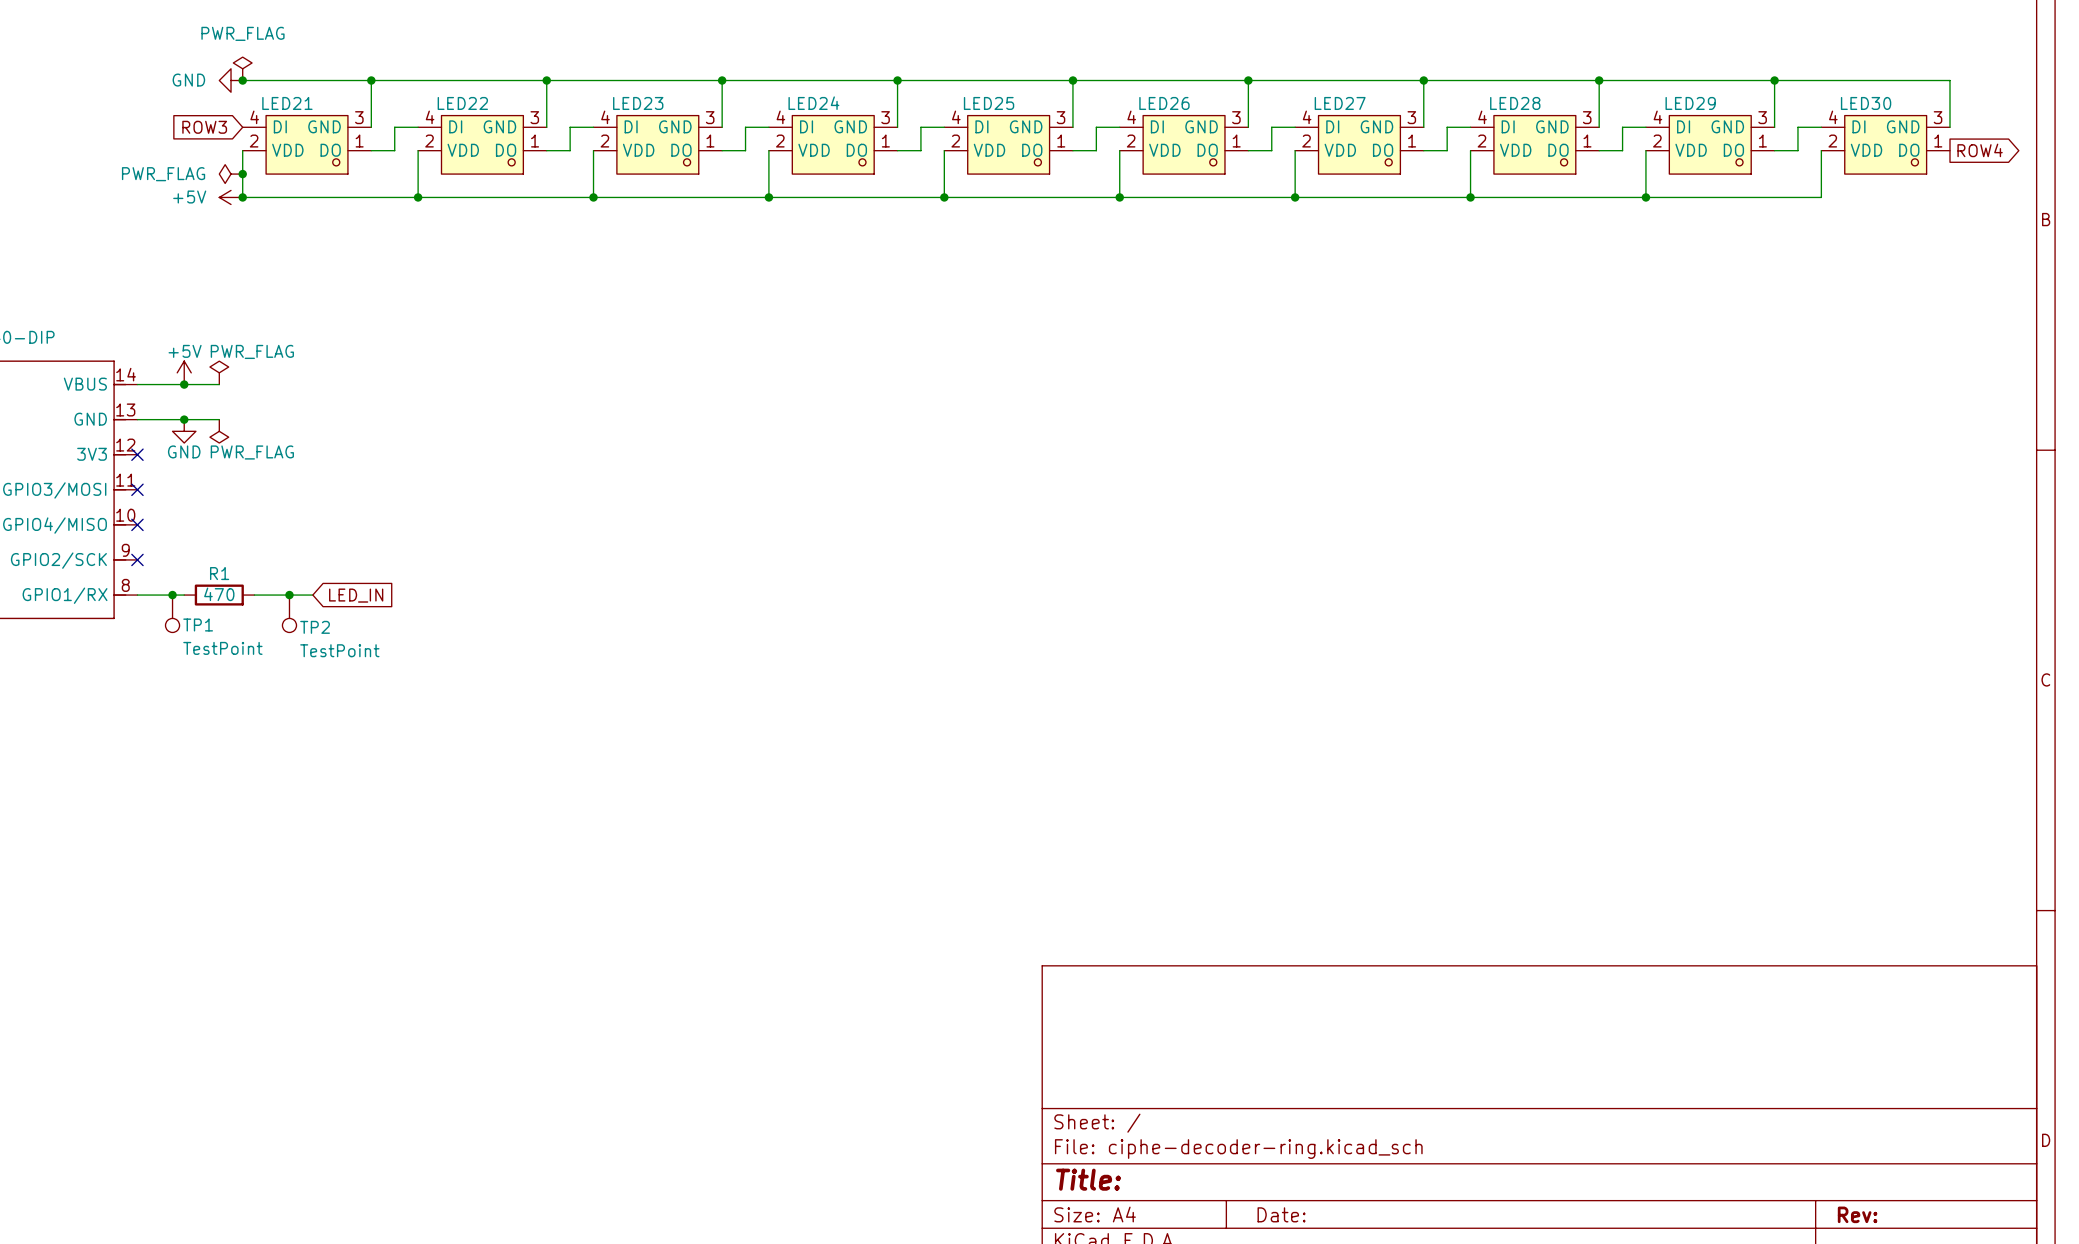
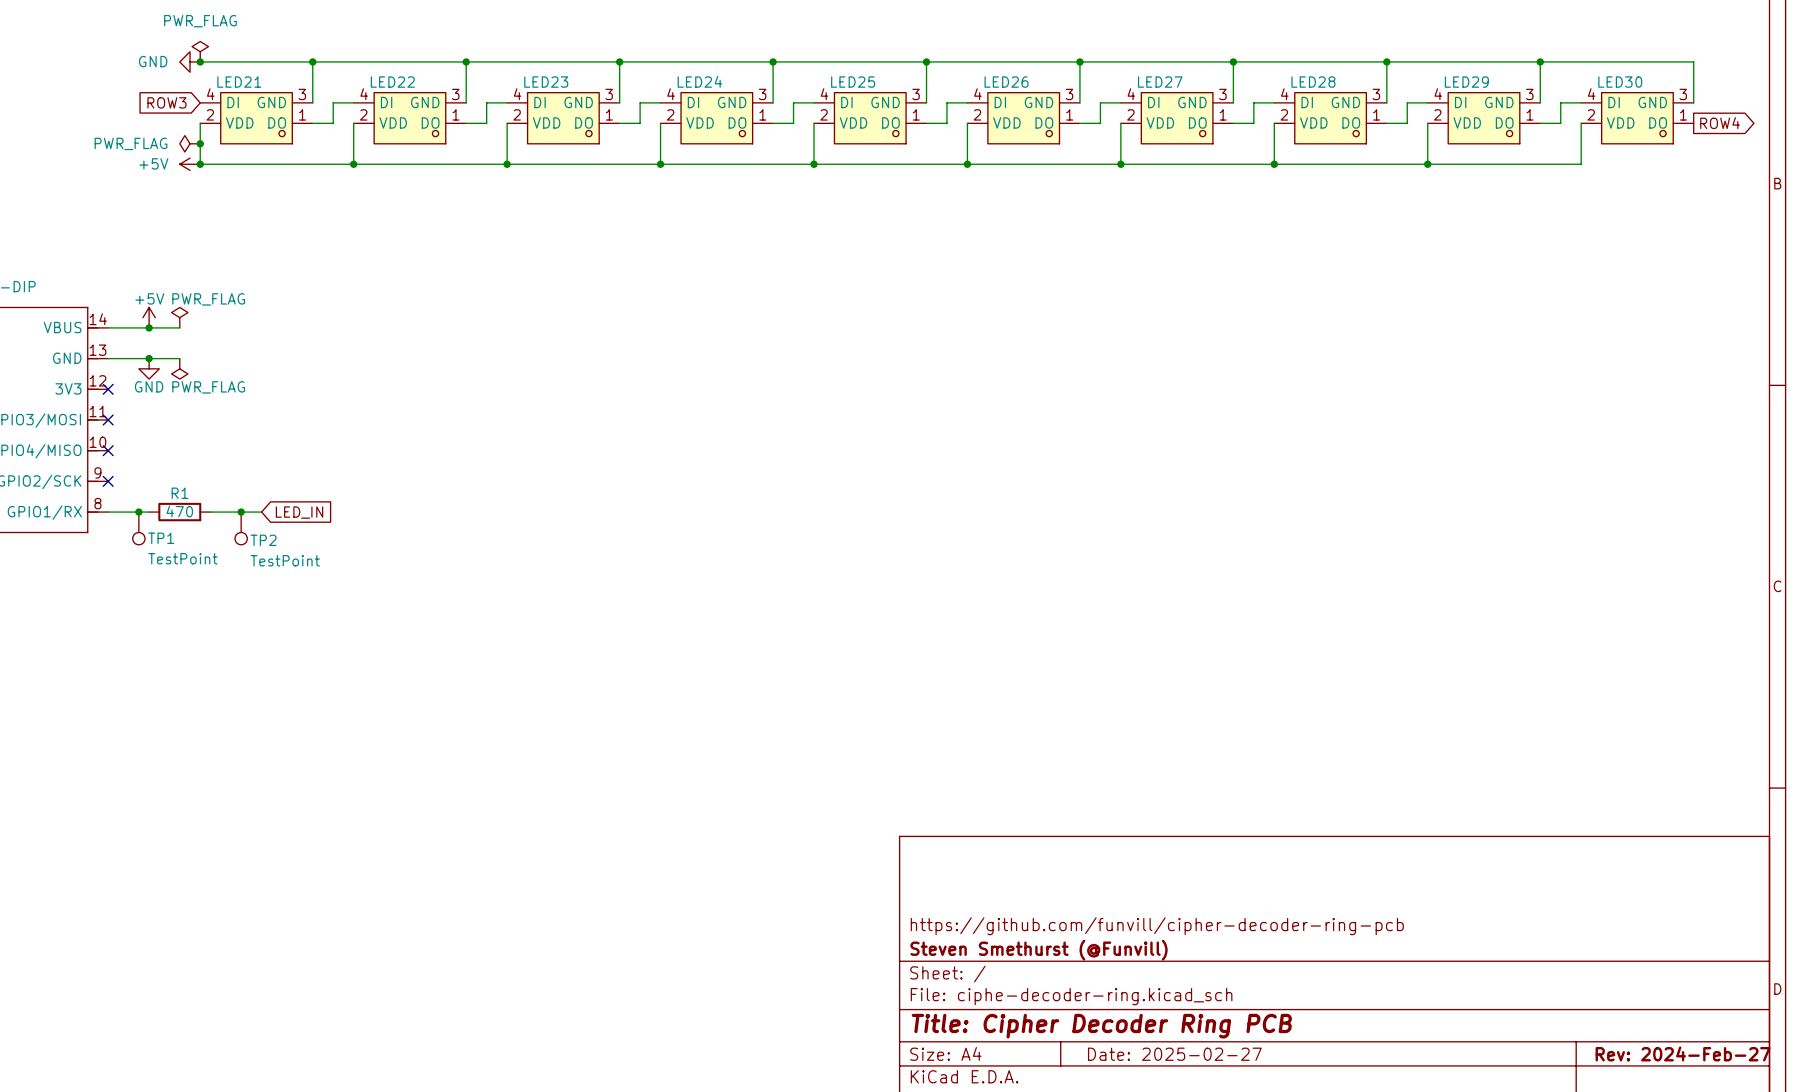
title block: none -> https://github.com/funvill/cipher-decoder-ring-pcb (1157, 926)
title block: none -> Steven Smethurst (@Funvill) (1038, 950)
title block: Title: (1088, 1179) -> Title: Cipher Decoder Ring PCB (1101, 1026)
title block: Date: (1281, 1214) -> Date: 2025-02-27 (1174, 1054)
title block: Rev: (1857, 1214) -> Rev: 2024-Feb-27 (1683, 1053)

